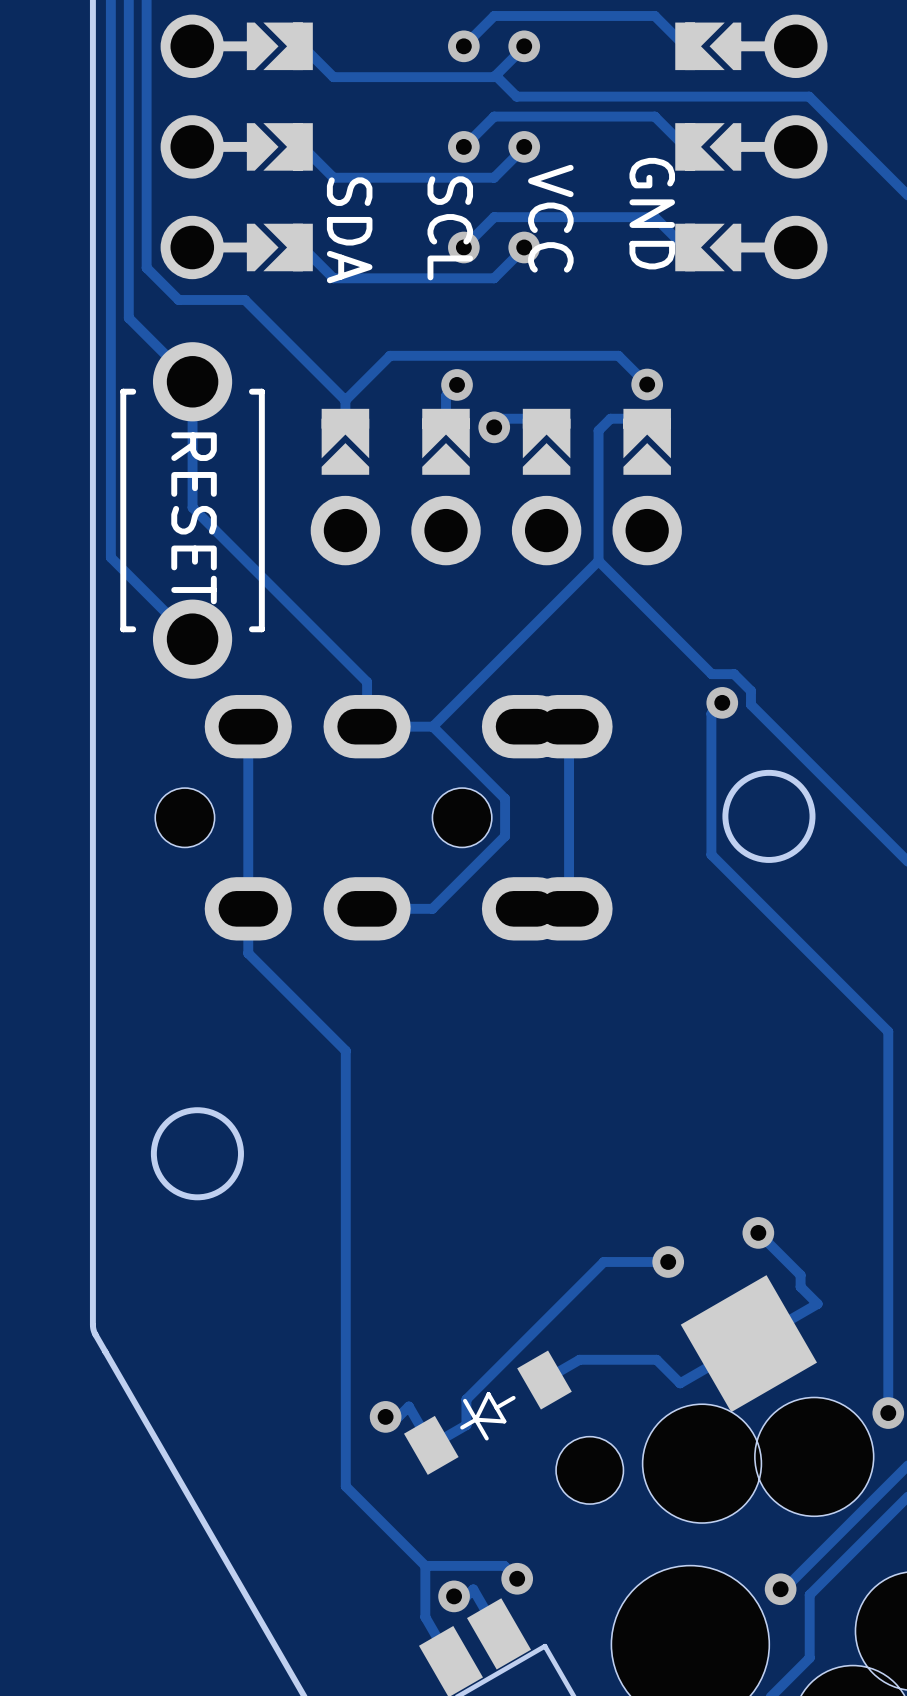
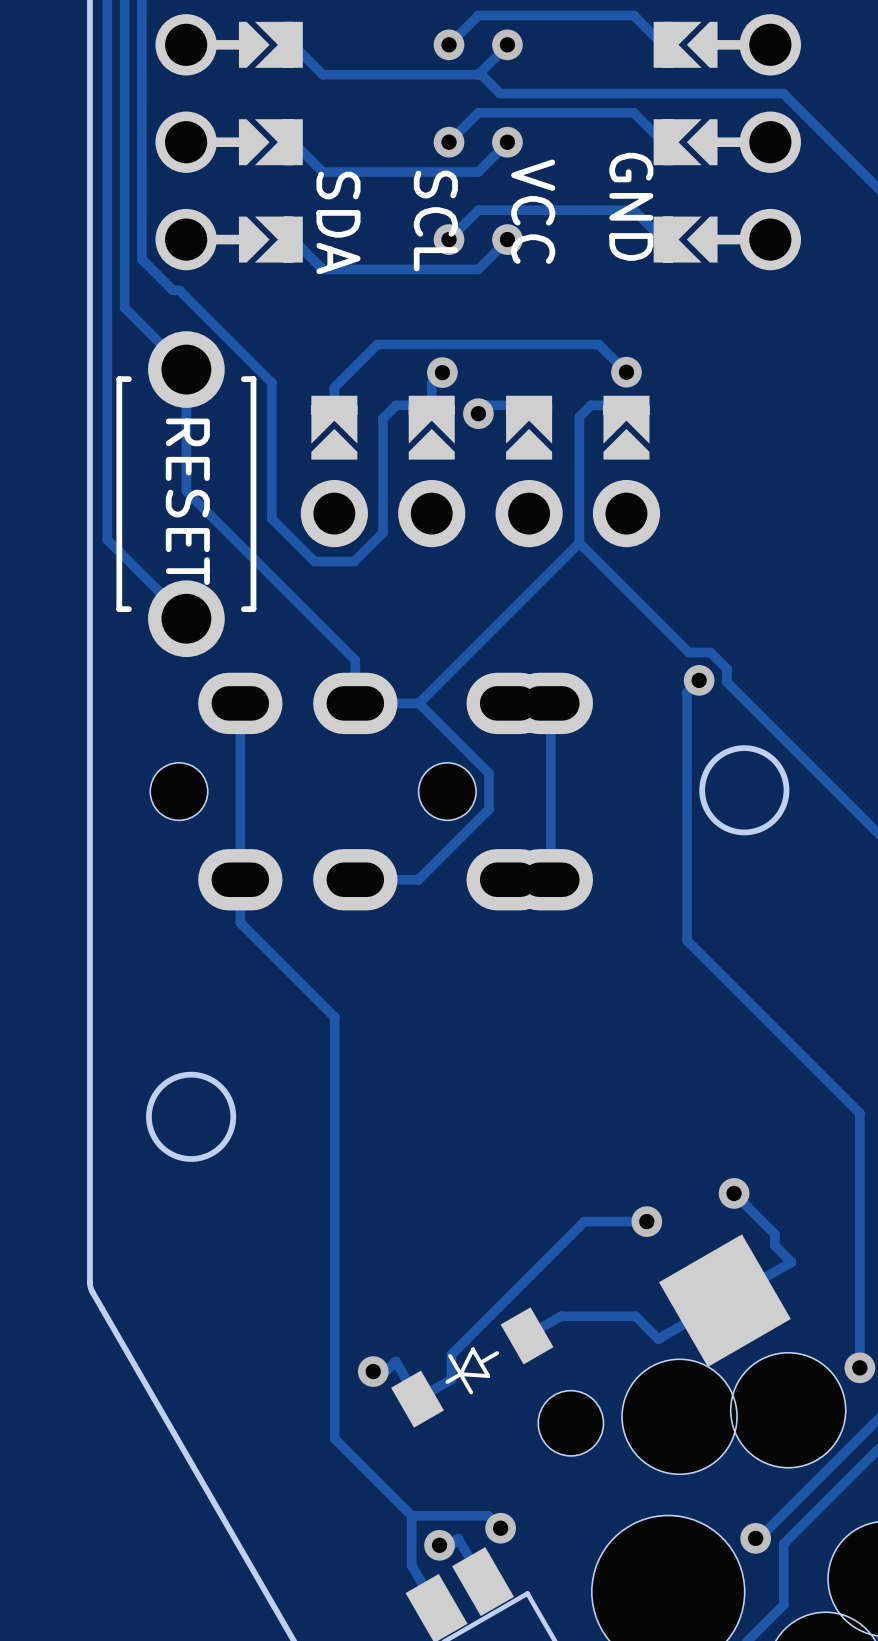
track: (185, 299) (245, 299) (345, 400) -> (179, 290) (271, 382) (271, 518) (314, 561) (354, 561) (383, 532) (383, 418) (396, 405) (431, 405)
track: (711, 713) (711, 854) (888, 1031) (888, 1150) -> (688, 690) (687, 692) (687, 940) (859, 1113)

